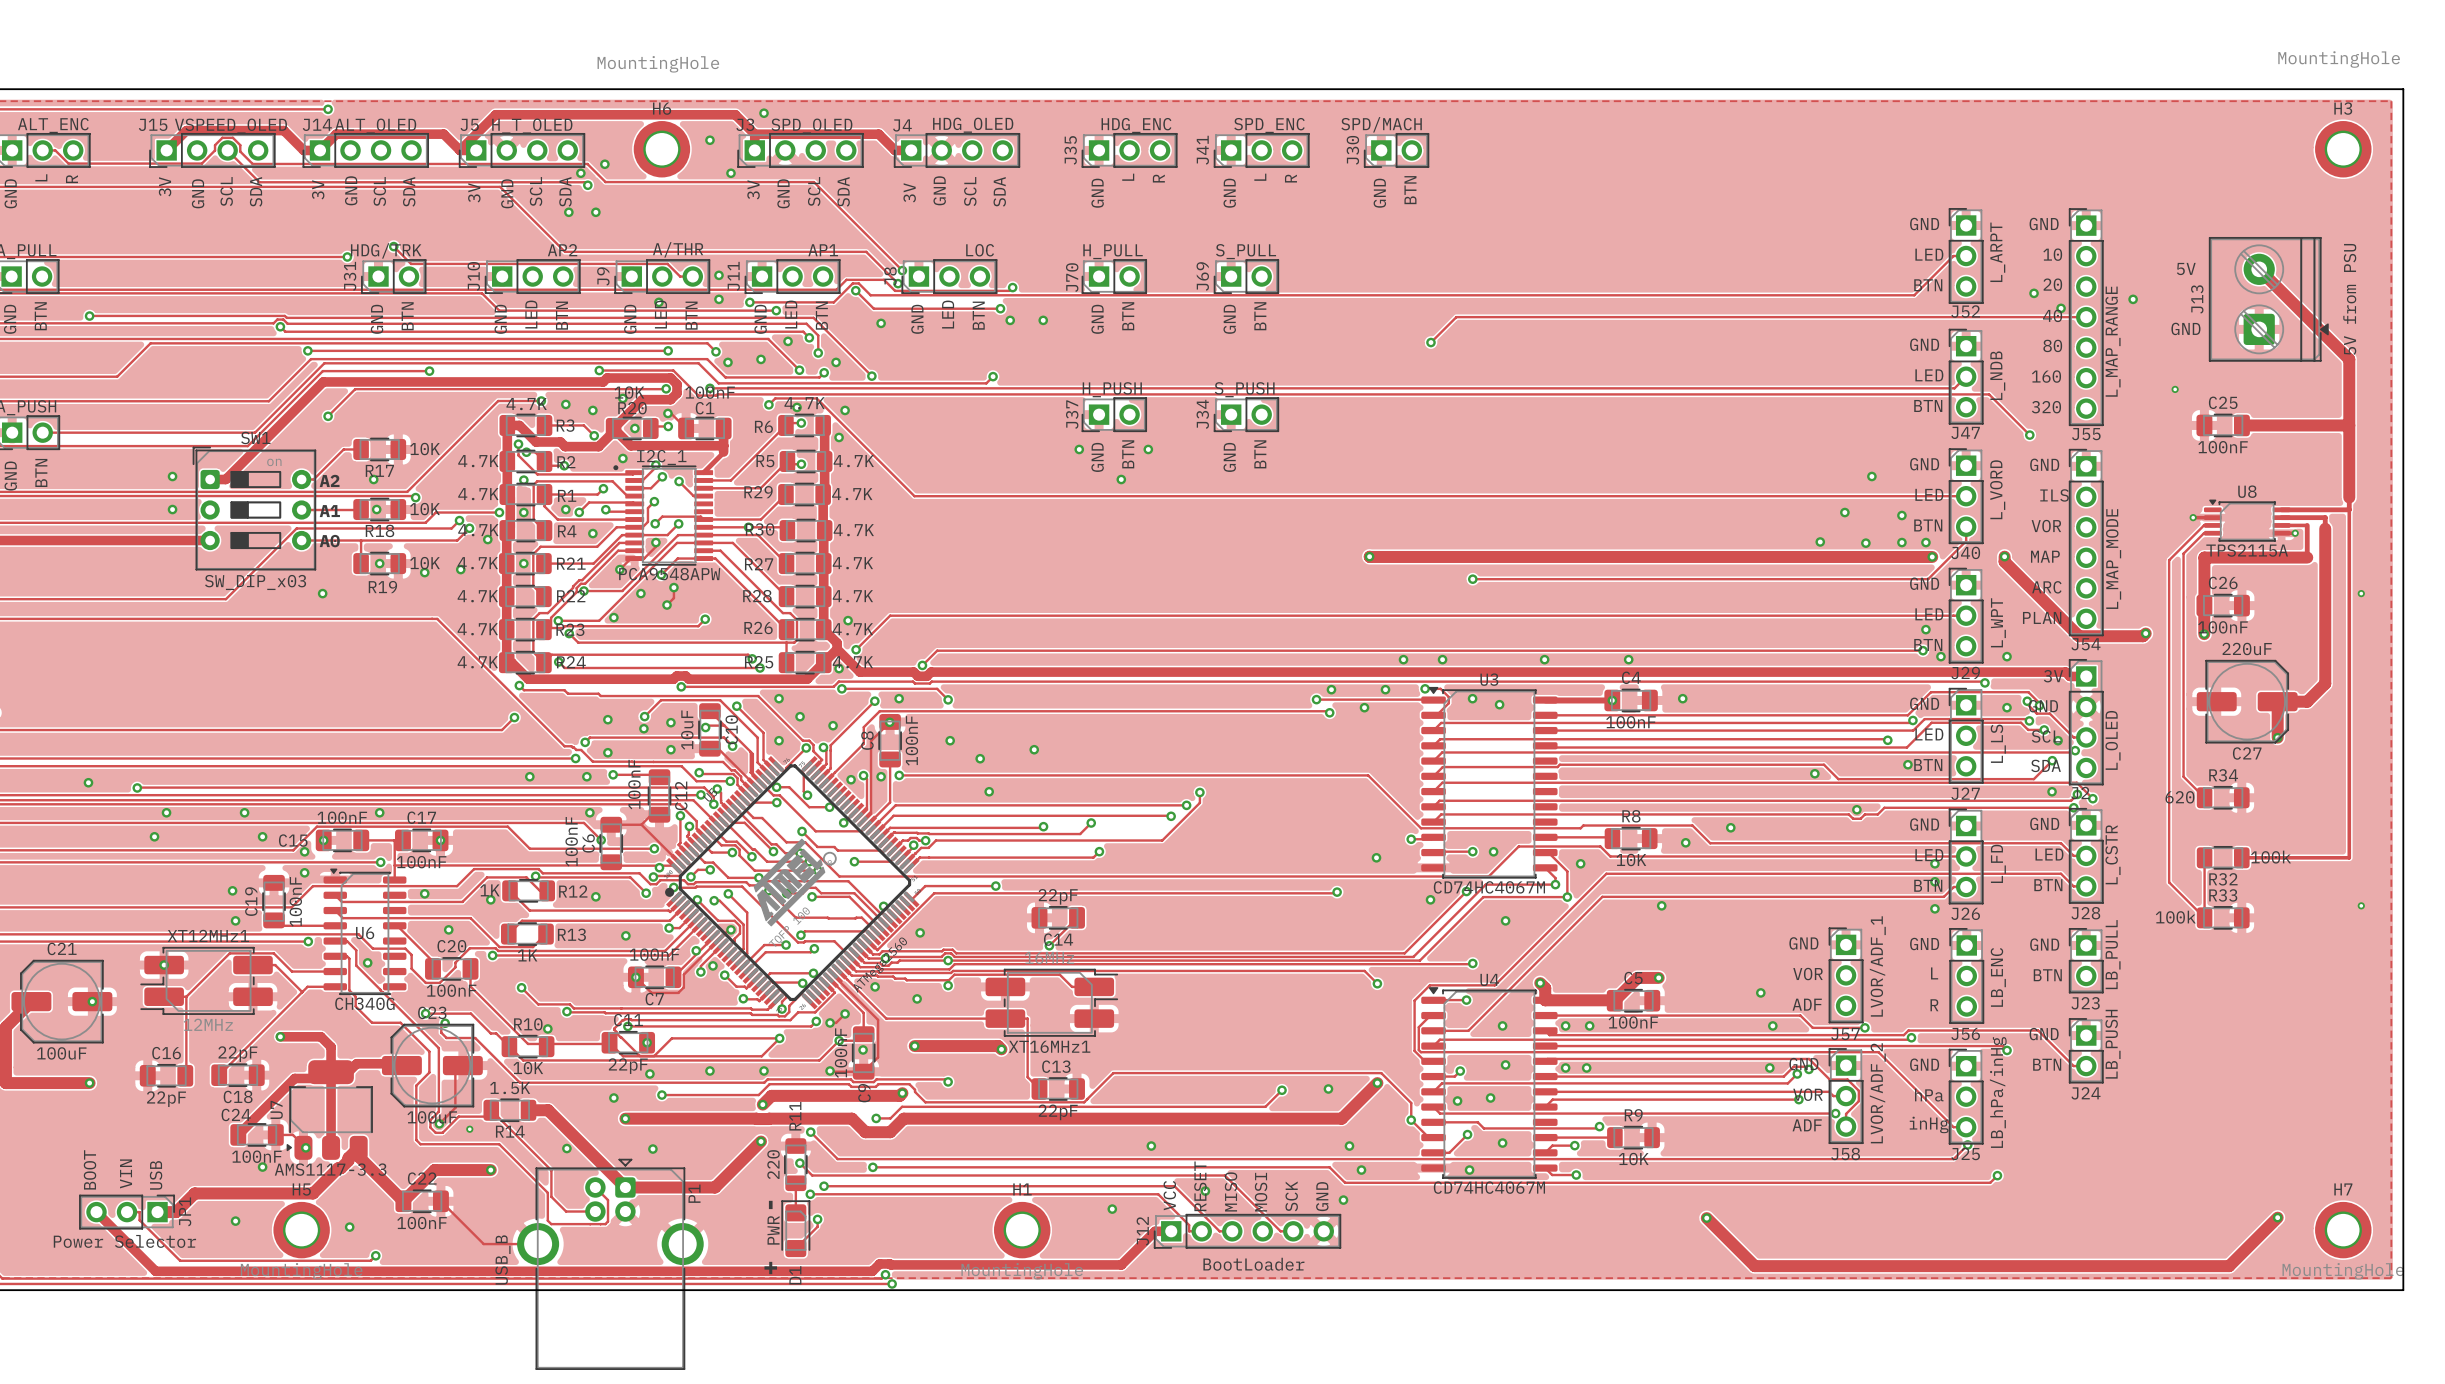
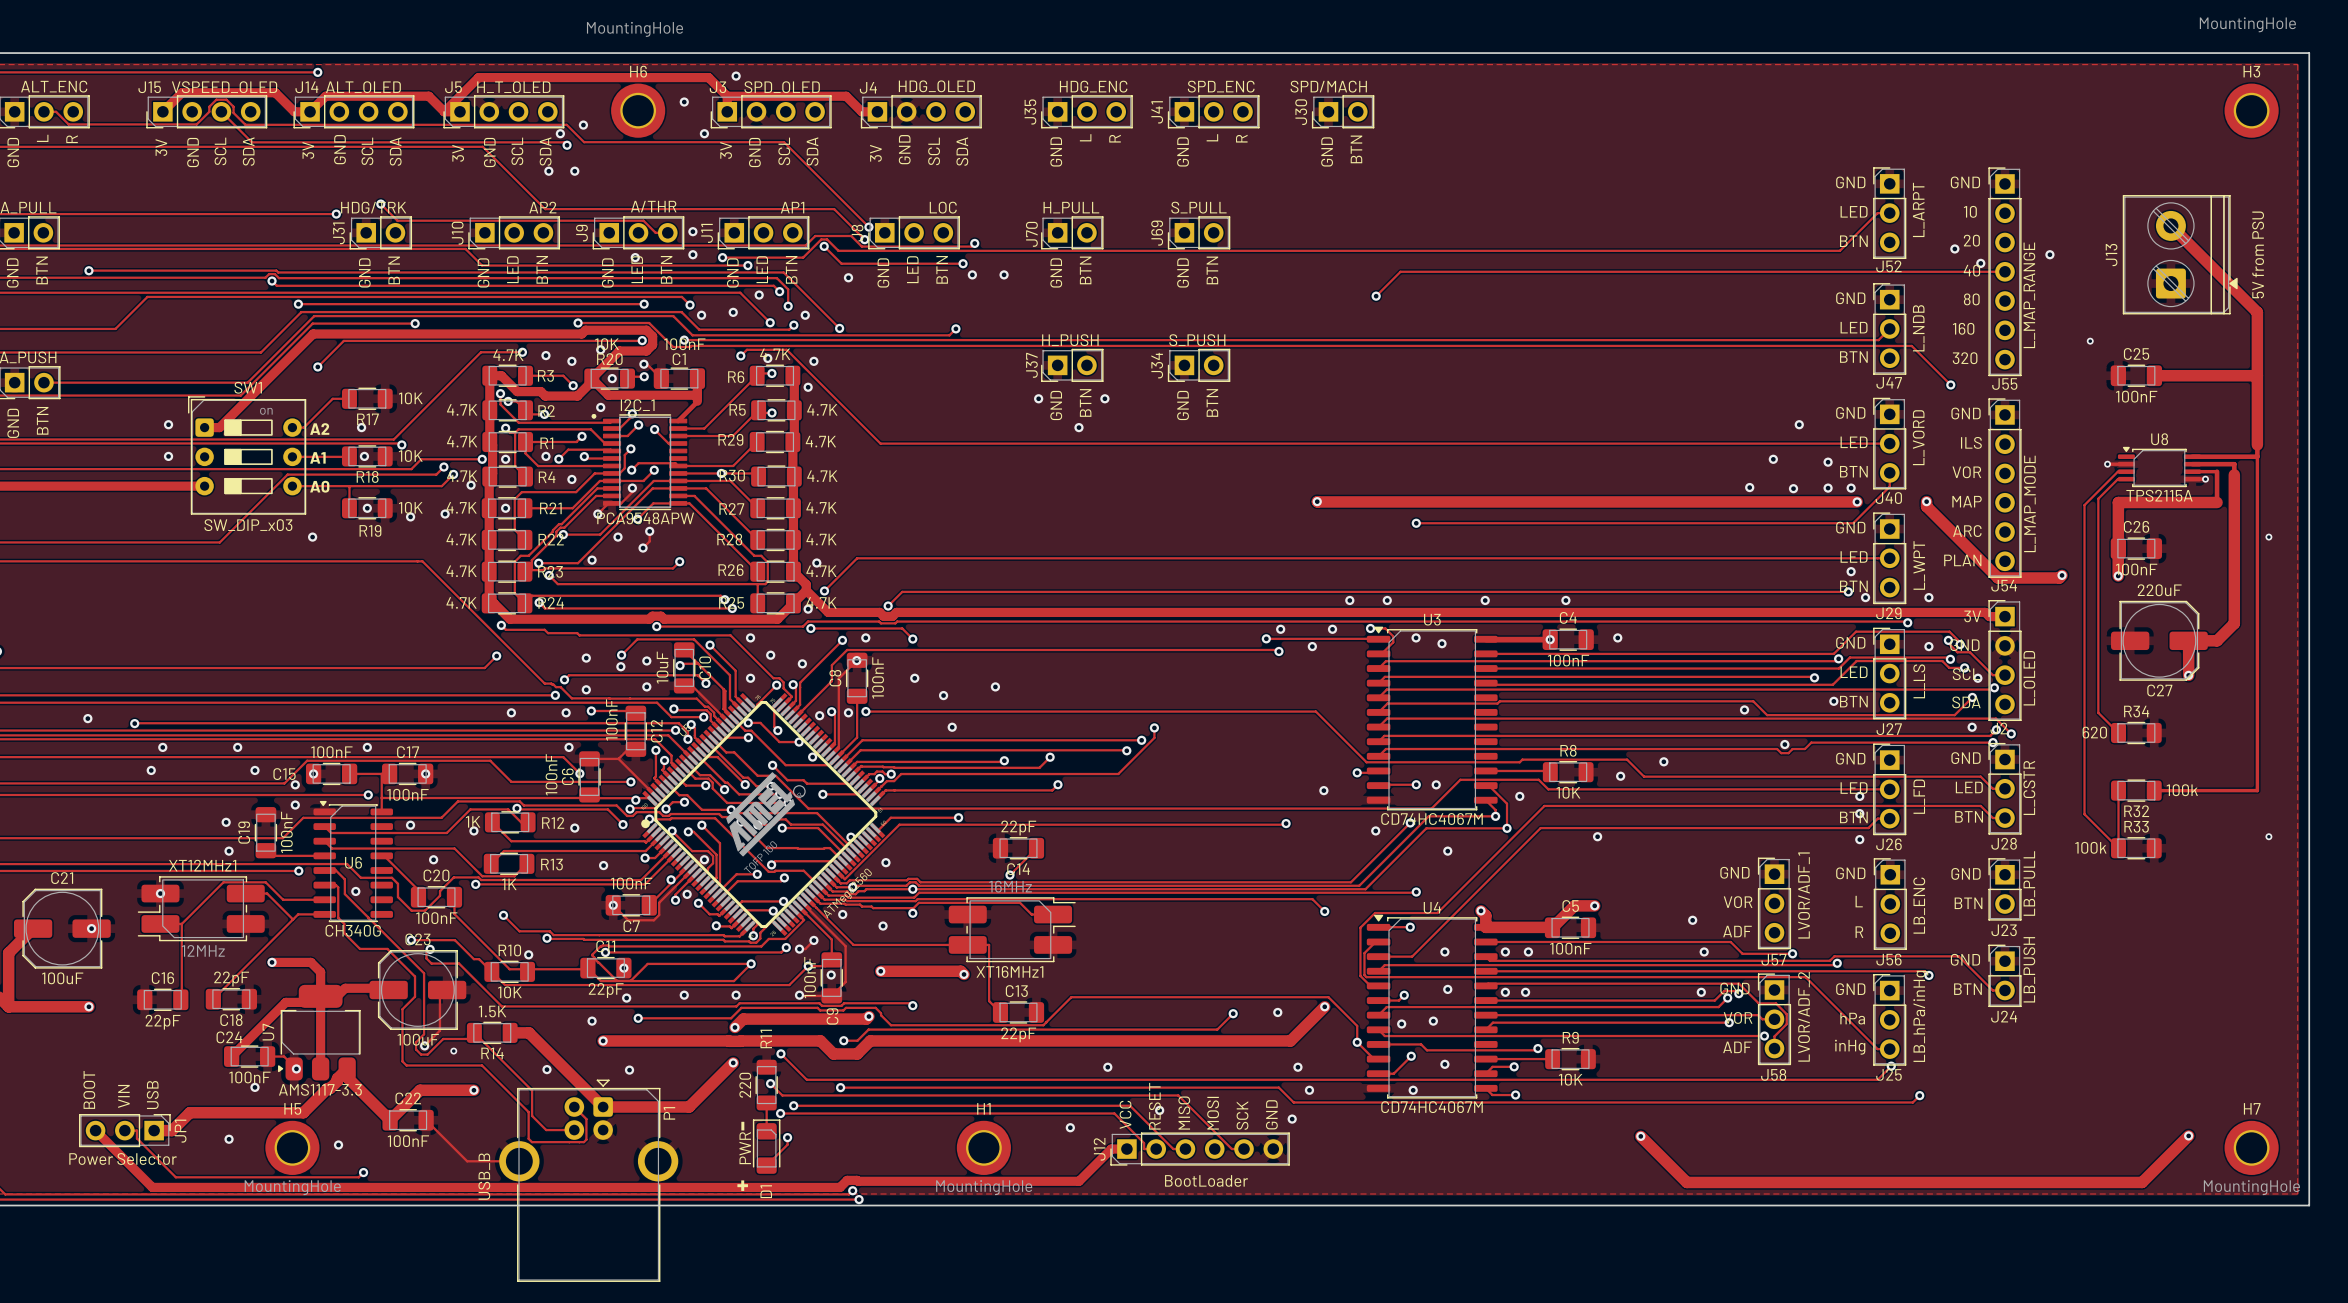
text: 5V (2186, 268) -> none
text: GND (2185, 328) -> none

